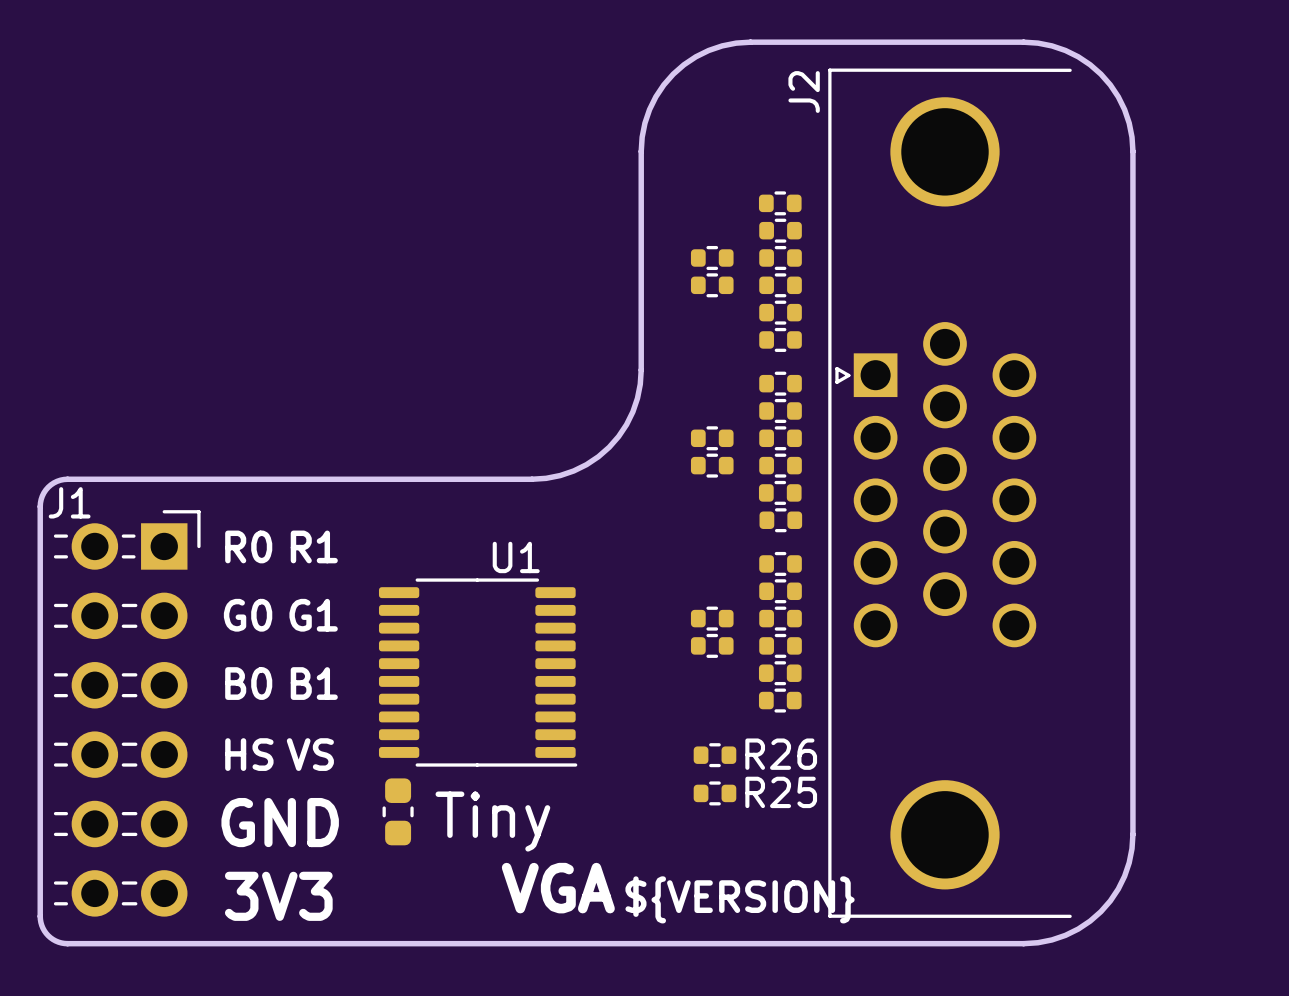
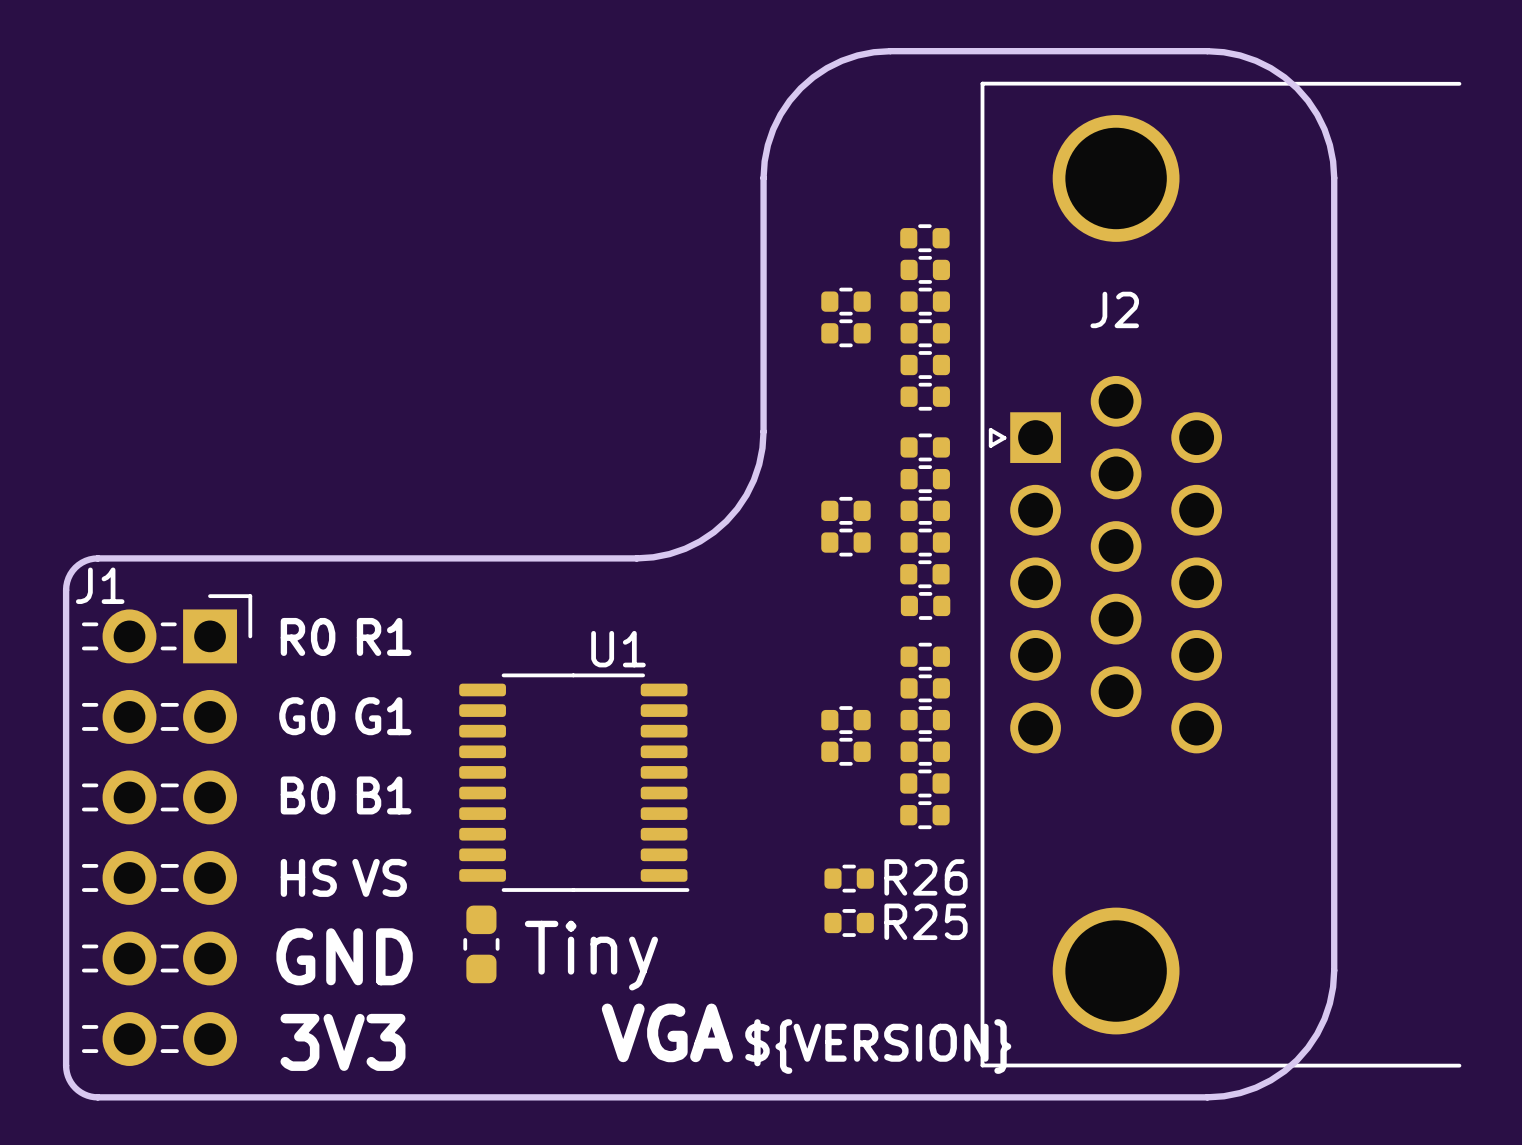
J2 footprint: [828, 68, 1072, 918] -> [980, 81, 1462, 1068]
J2 name position: J2 (804, 92) -> J2 (1114, 309)

